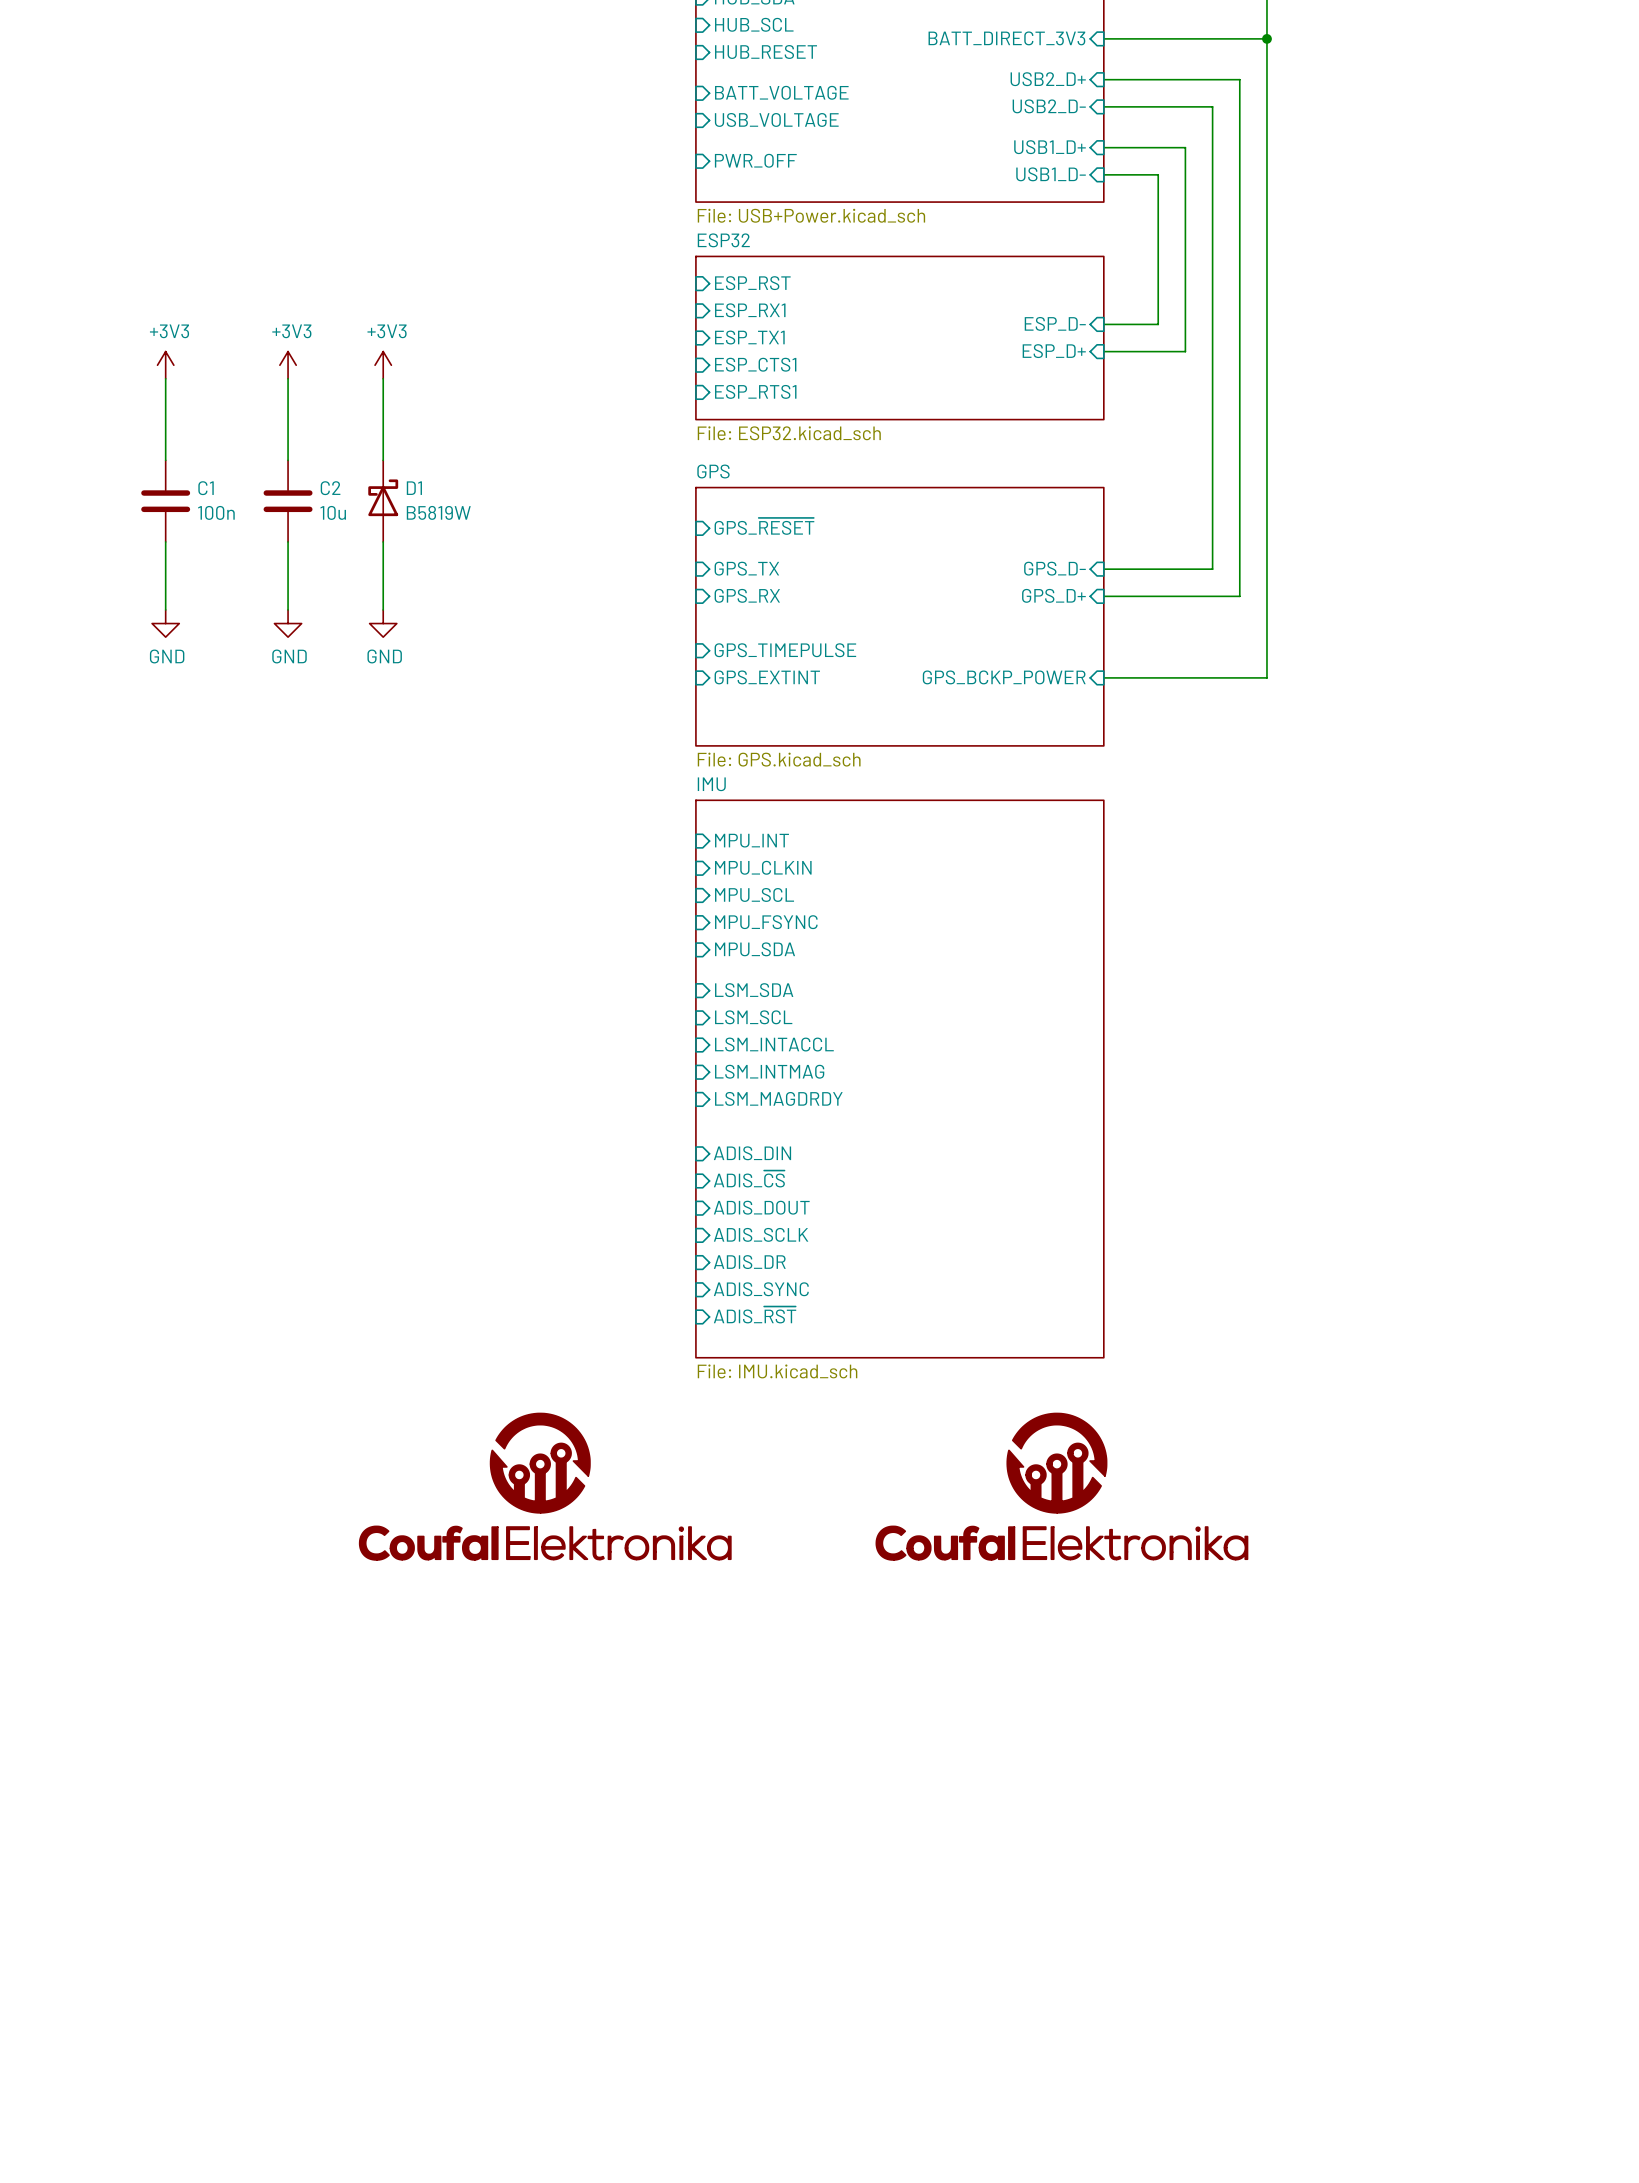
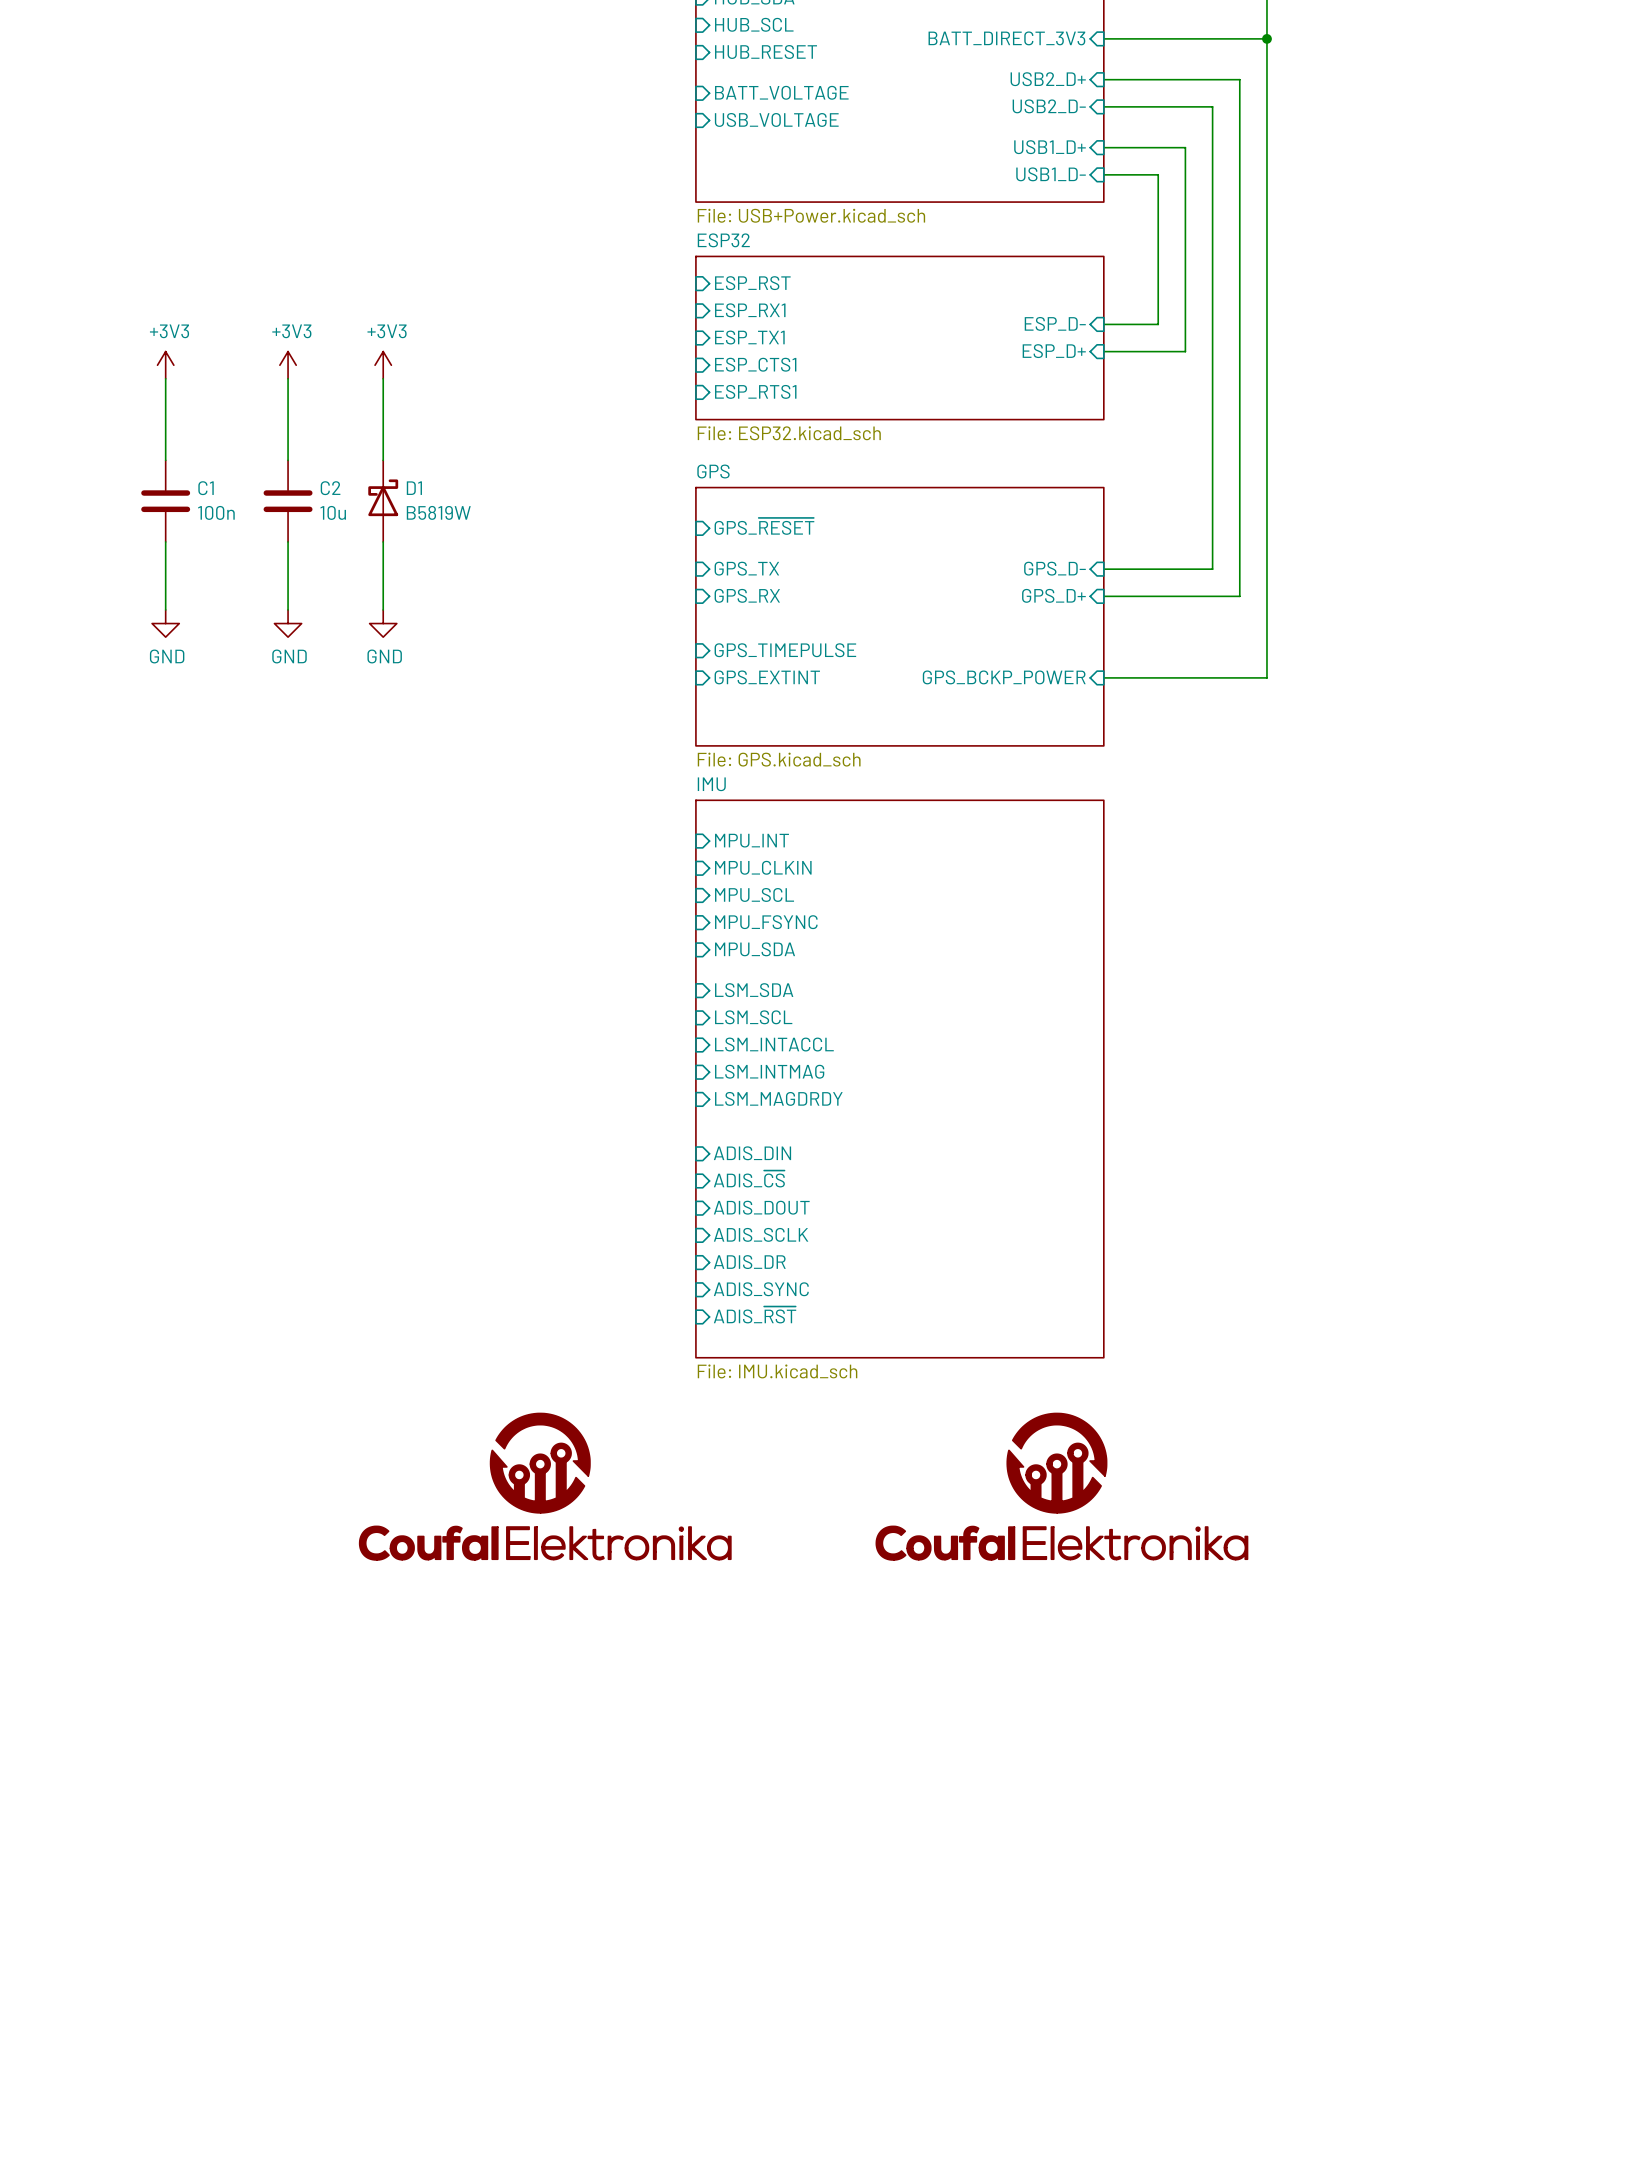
sheet pin: PWR_OFF (755, 160) -> none

